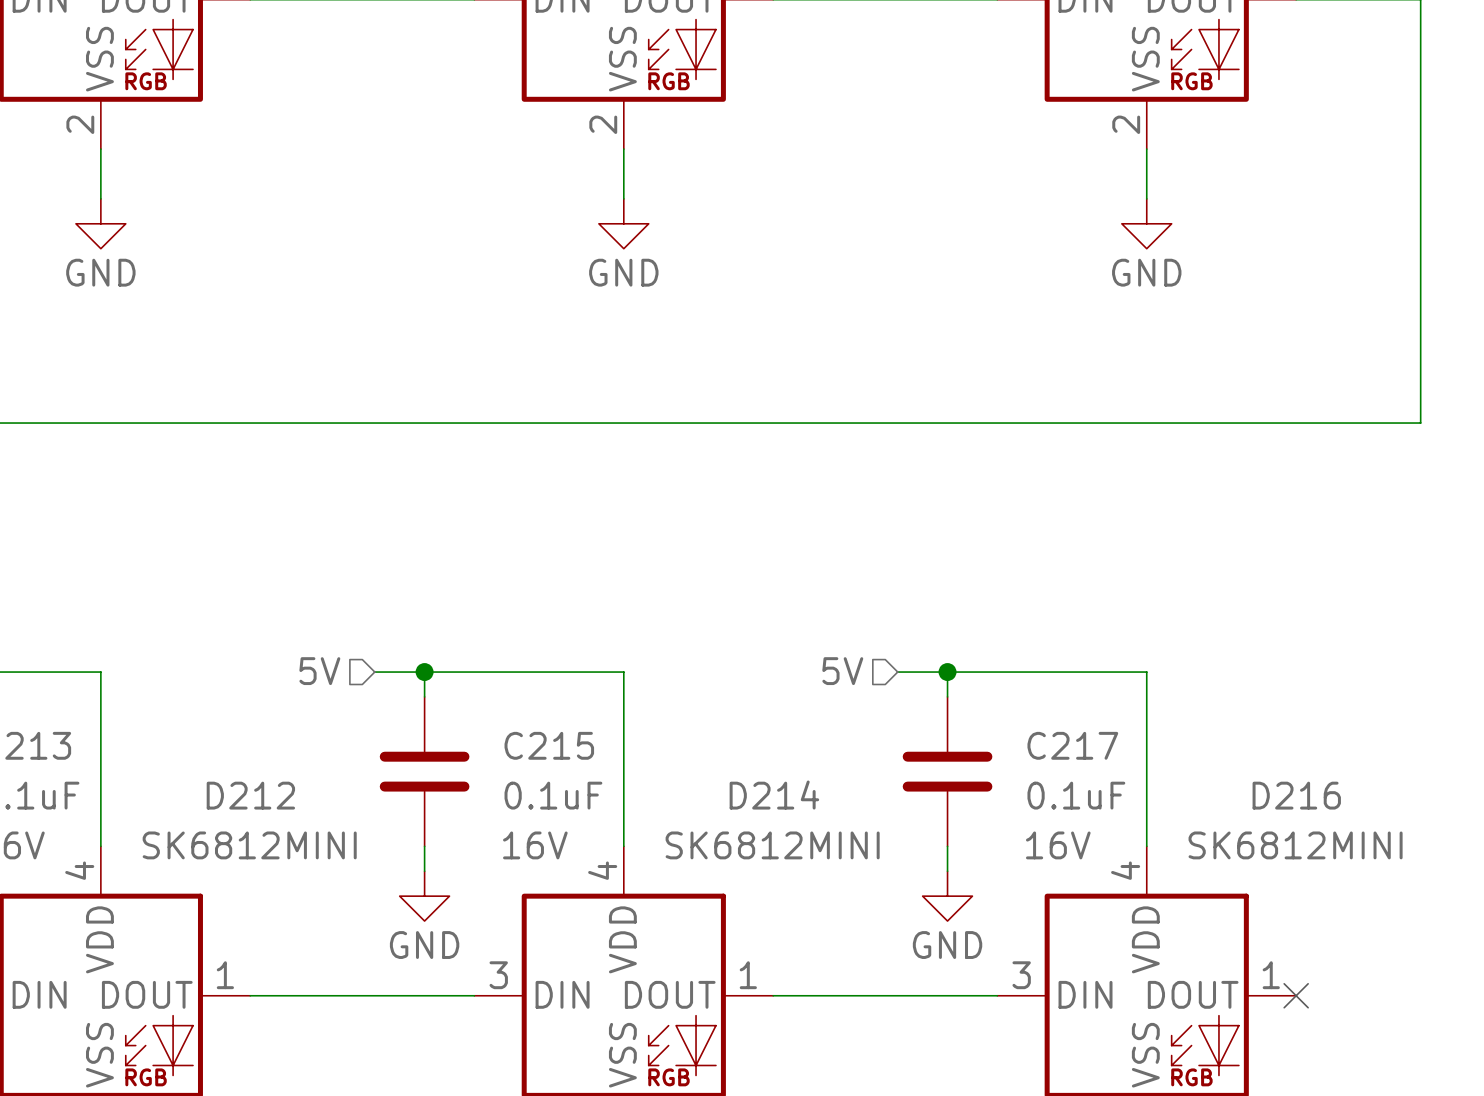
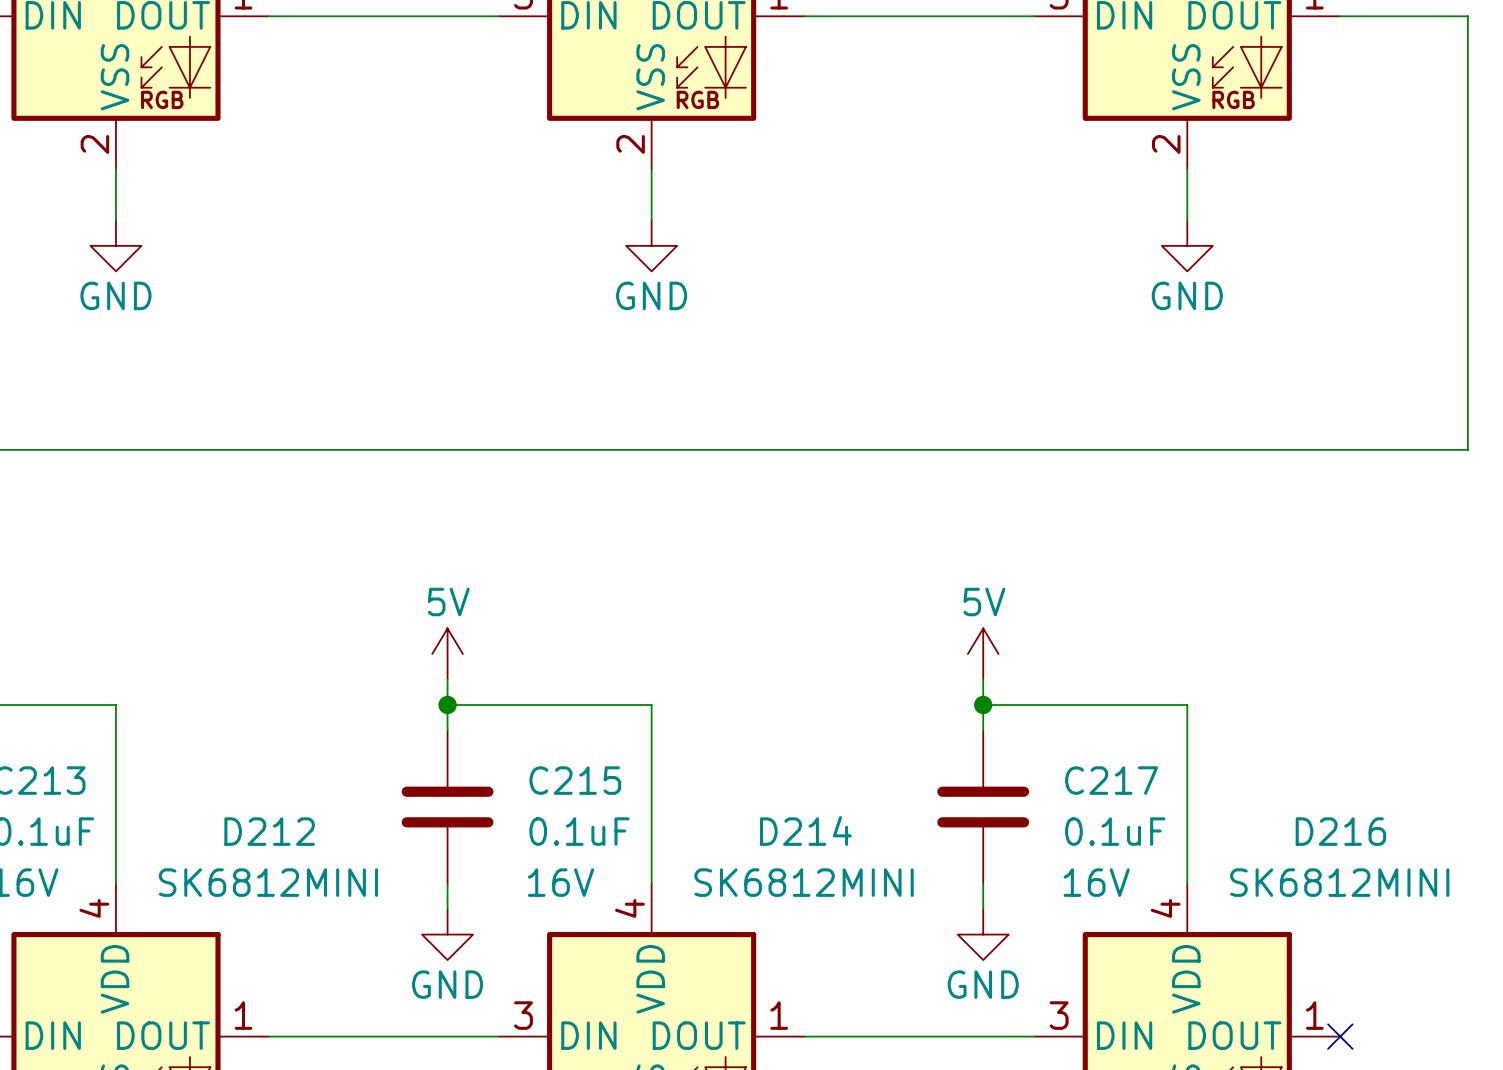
power symbol: none -> 5V (447, 653)
power symbol: none -> 5V (983, 653)
hierarchical label: 5V (319, 671) -> none
hierarchical label: 5V (842, 671) -> none
wire: (374, 672) (424, 672) -> (447, 679) (447, 705)
wire: (897, 672) (947, 672) -> (983, 679) (983, 705)

